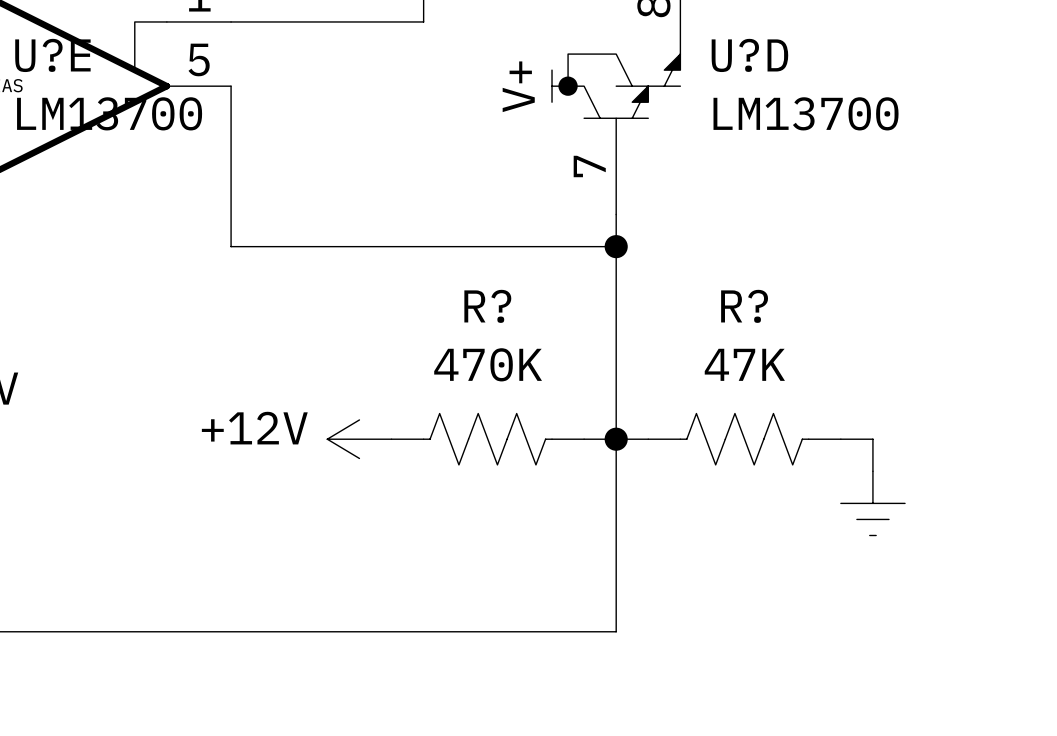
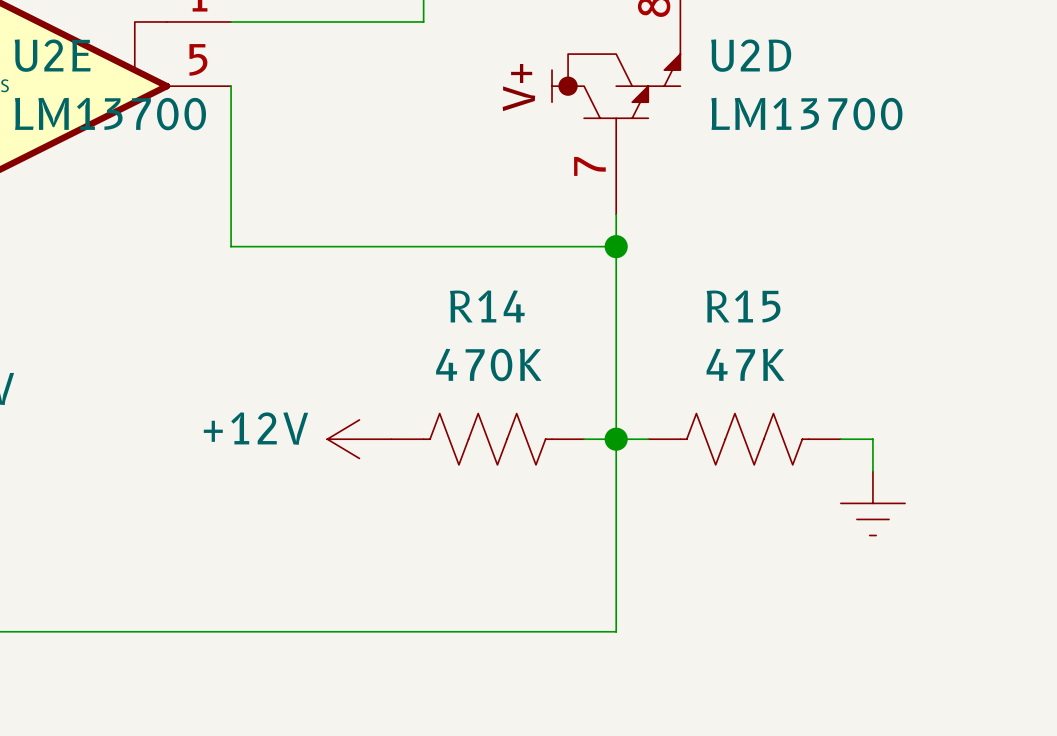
U?E name: U?E (52, 55) -> U2E (52, 55)
U?D name: U?D (749, 55) -> U2D (751, 55)
R? name: R? (487, 306) -> R14 (487, 306)
R? name: R? (744, 306) -> R15 (743, 306)

